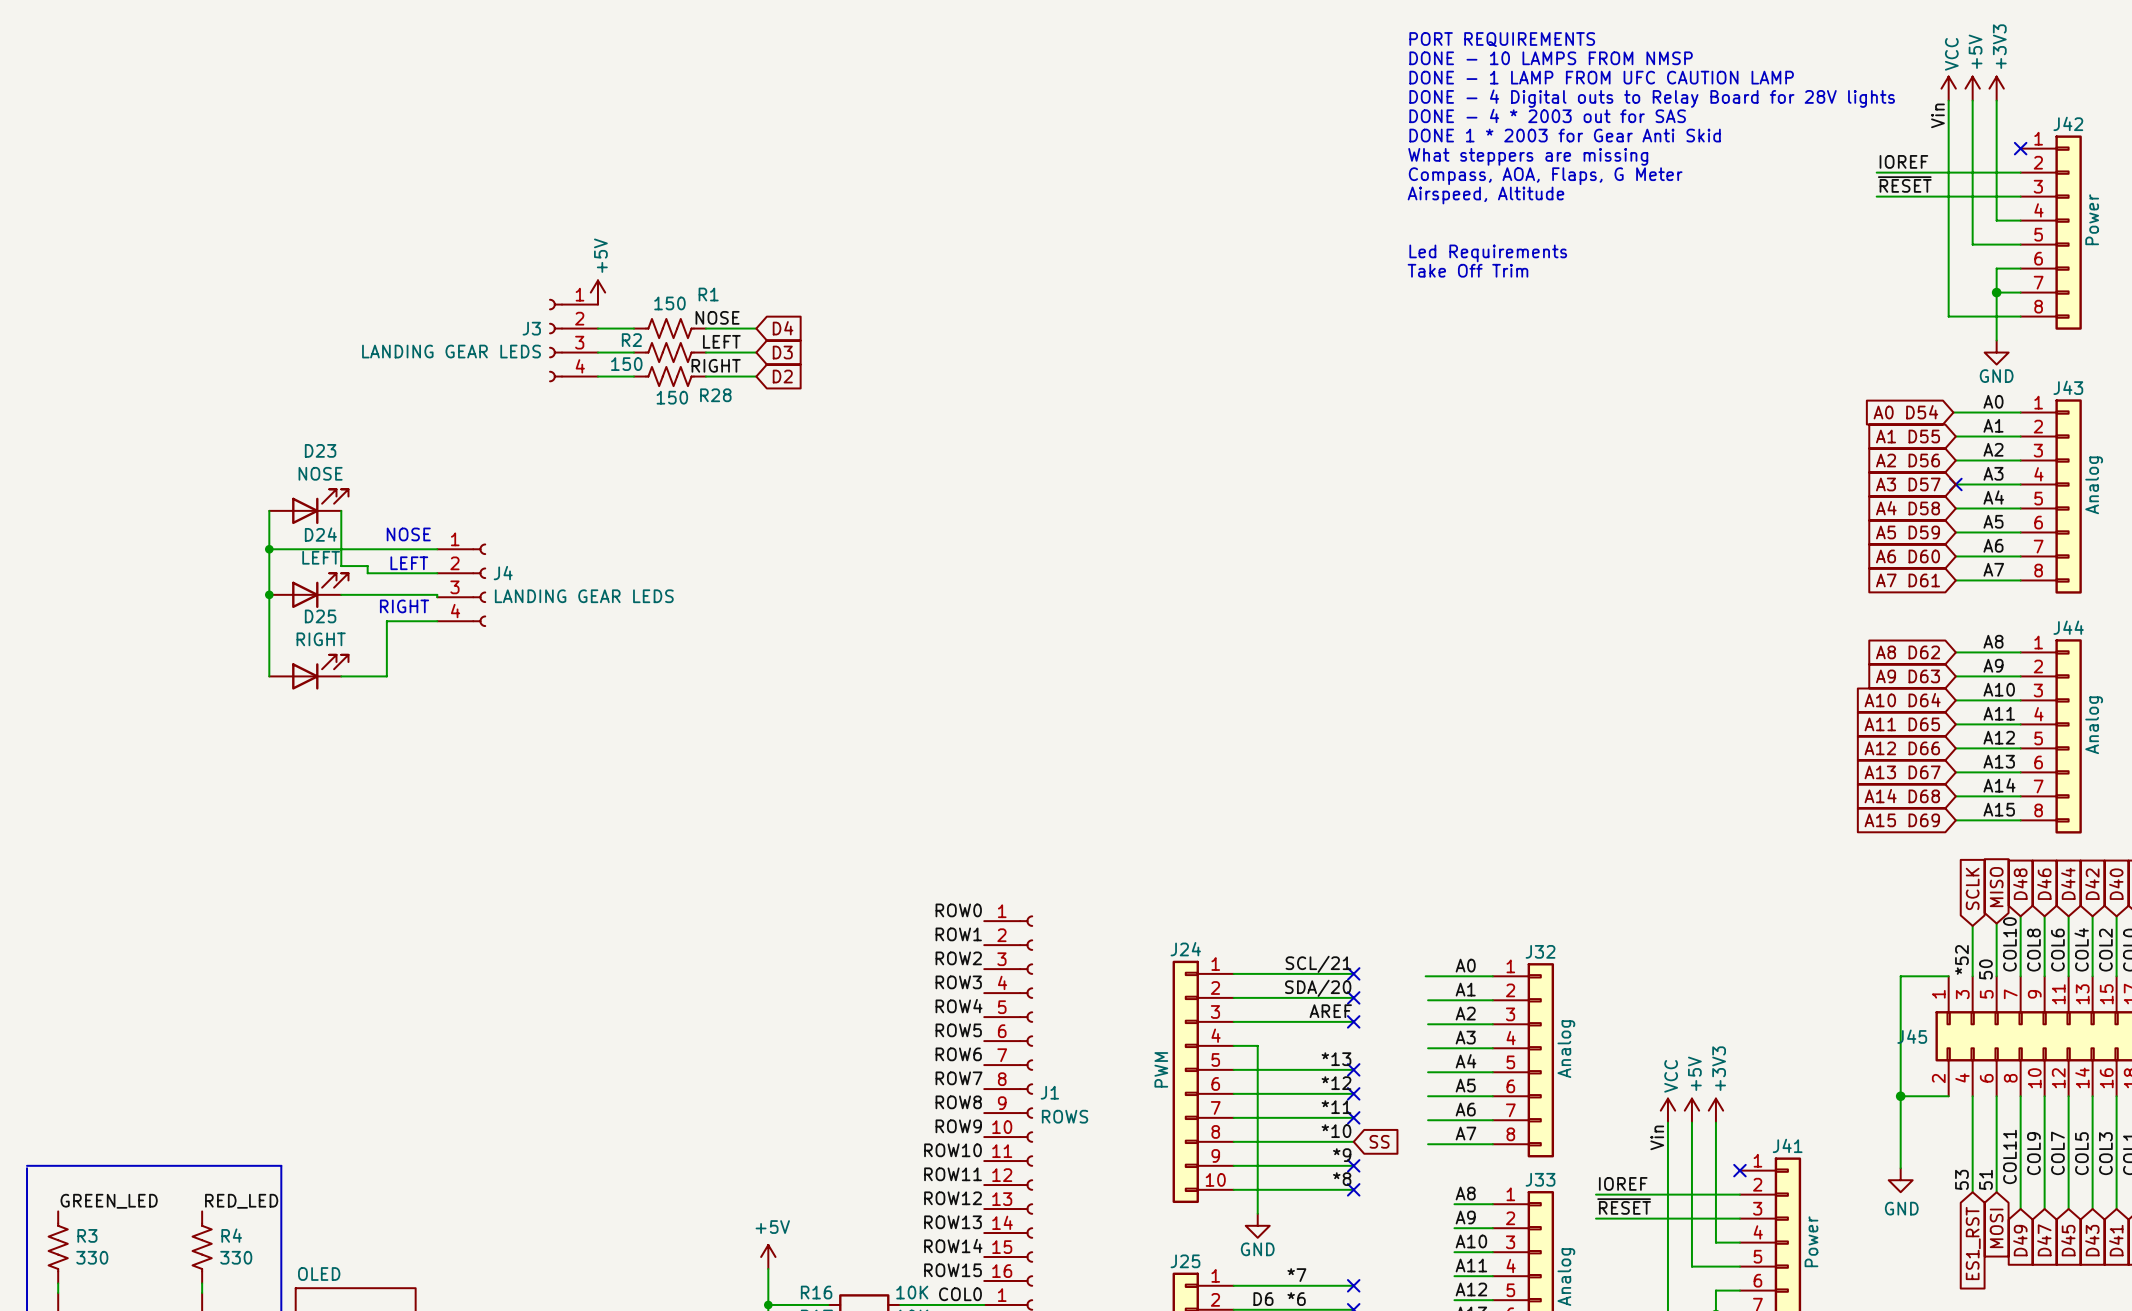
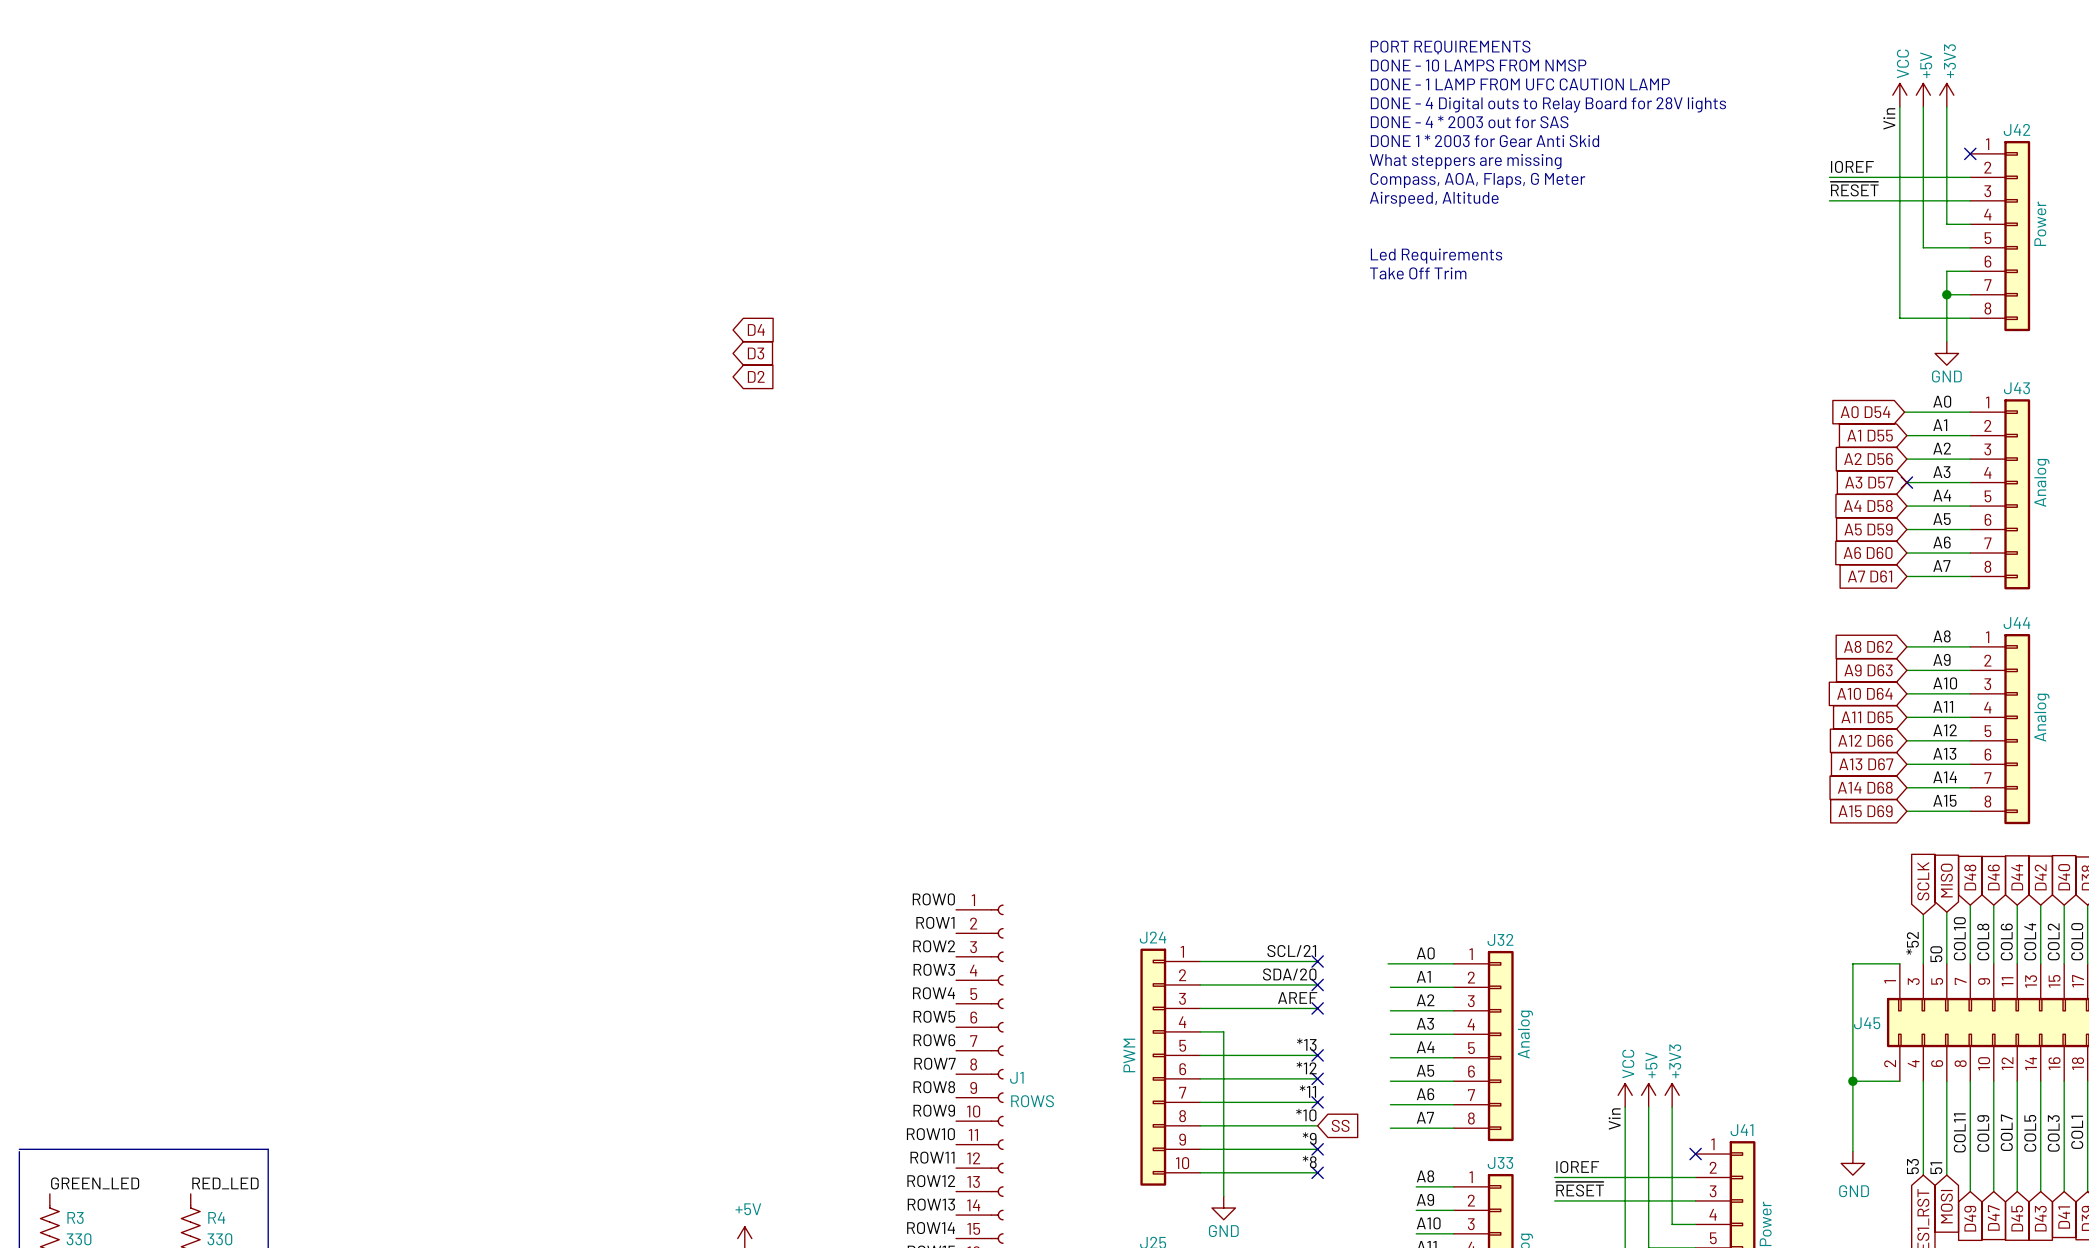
power symbol: +5V (597, 292) -> none
label: NOSE (717, 317) -> none
wire: (597, 328) (633, 328) -> none
R1: 150 (669, 328) -> none
wire: (705, 328) (756, 328) -> none
J3: LANDING GEAR LEDS (573, 340) -> none
label: LEFT (721, 341) -> none
wire: (597, 352) (633, 352) -> none
R2: 150 (669, 352) -> none
wire: (705, 352) (756, 352) -> none
label: RIGHT (716, 365) -> none
wire: (597, 376) (633, 376) -> none
R28: 150 (669, 376) -> none
wire: (705, 376) (756, 376) -> none
D23: NOSE (308, 506) -> none
wire: (269, 510) (269, 676) -> none
wire: (341, 510) (341, 566) (367, 566) (367, 573) (437, 573) -> none
text: NOSE (408, 534) -> none
wire: (269, 549) (437, 549) -> none
junction: (269, 549) -> none
text: LEFT (409, 563) -> none
J4: LANDING GEAR LEDS (461, 585) -> none
D24: LEFT (308, 590) -> none
junction: (269, 594) -> none
wire: (341, 594) (437, 594) (437, 597) -> none
text: RIGHT (404, 606) -> none
wire: (437, 621) (386, 621) (386, 676) (341, 676) -> none
D25: RIGHT (308, 672) -> none

